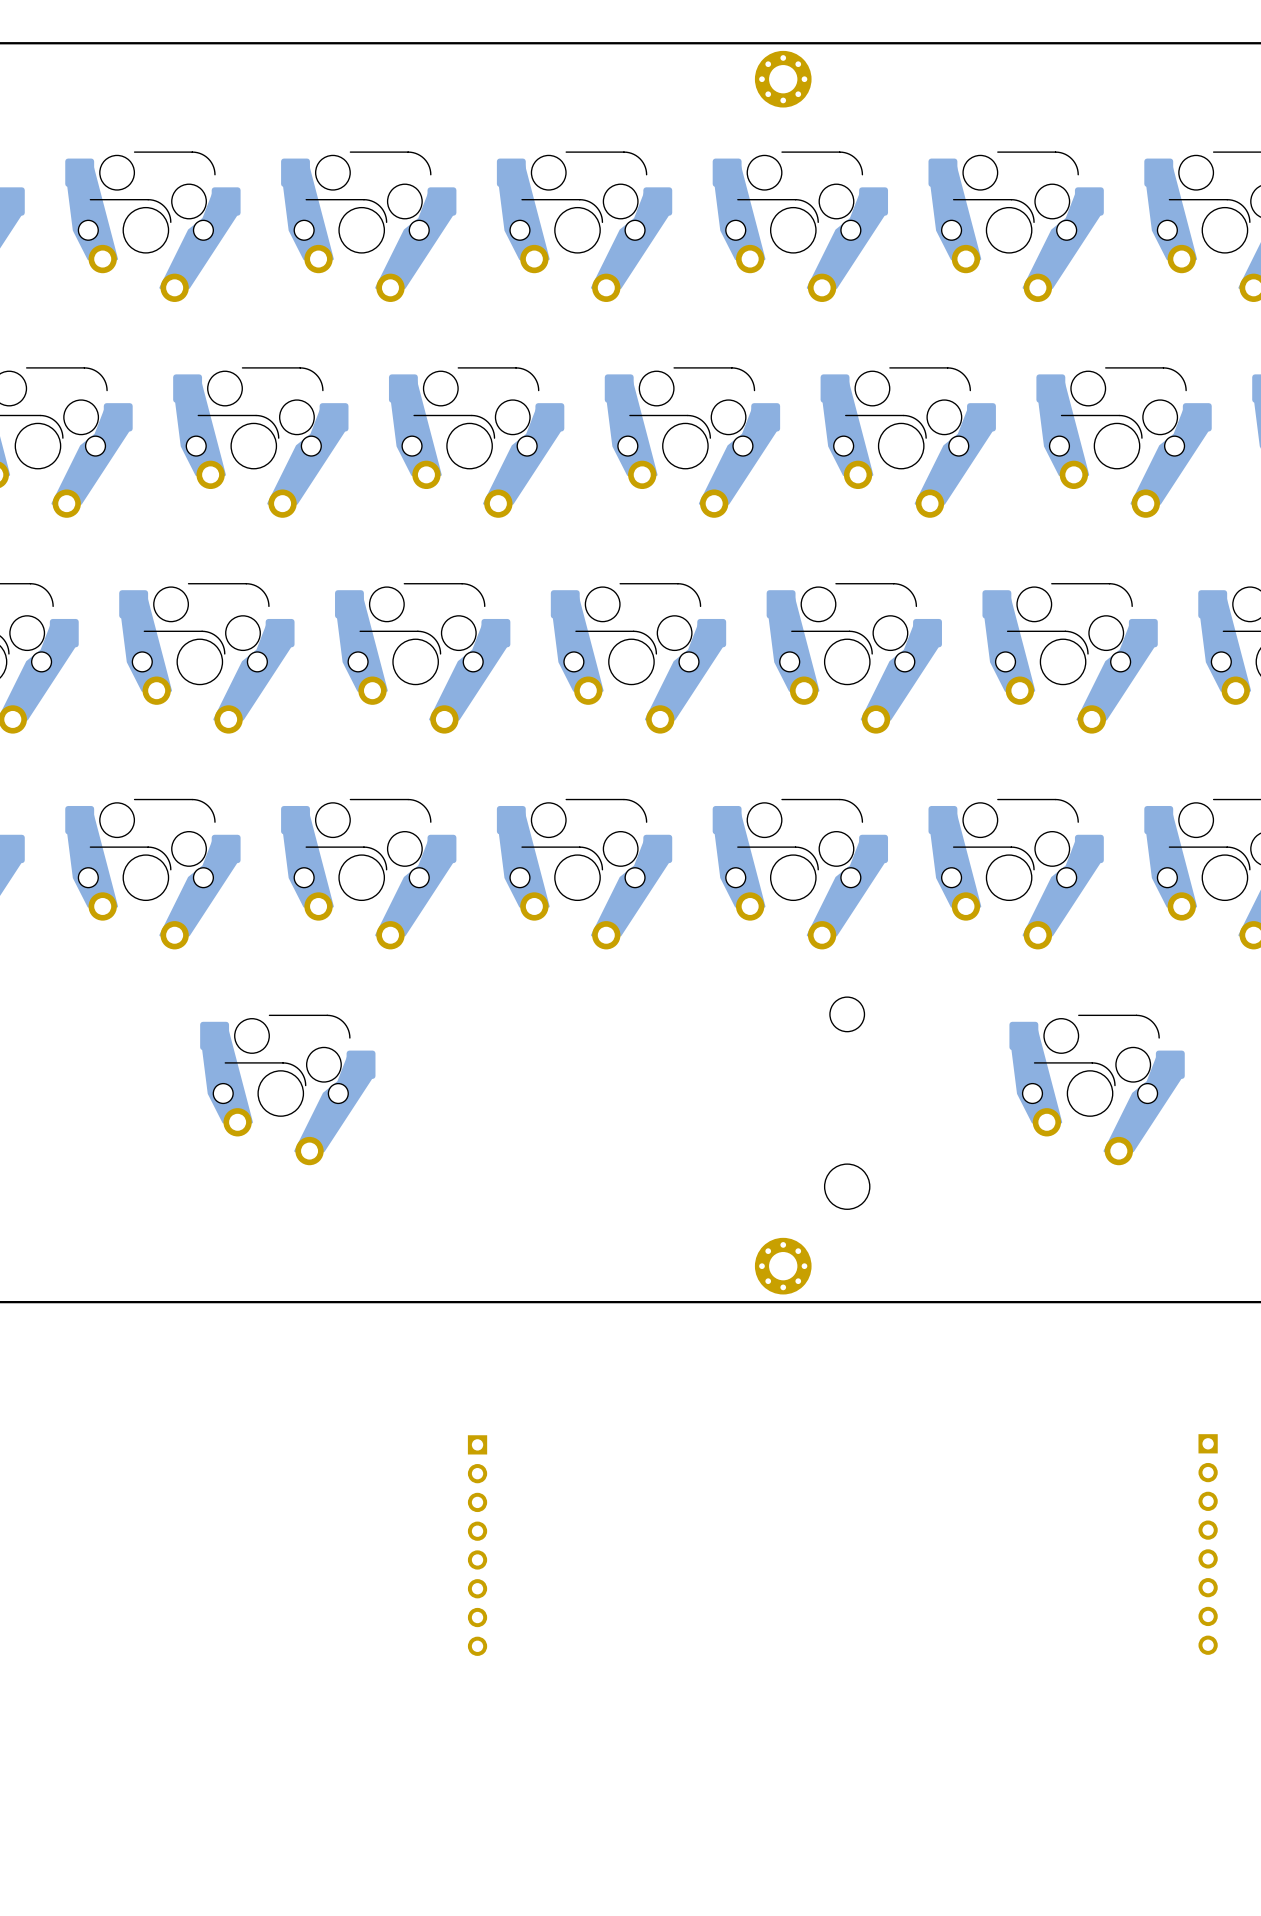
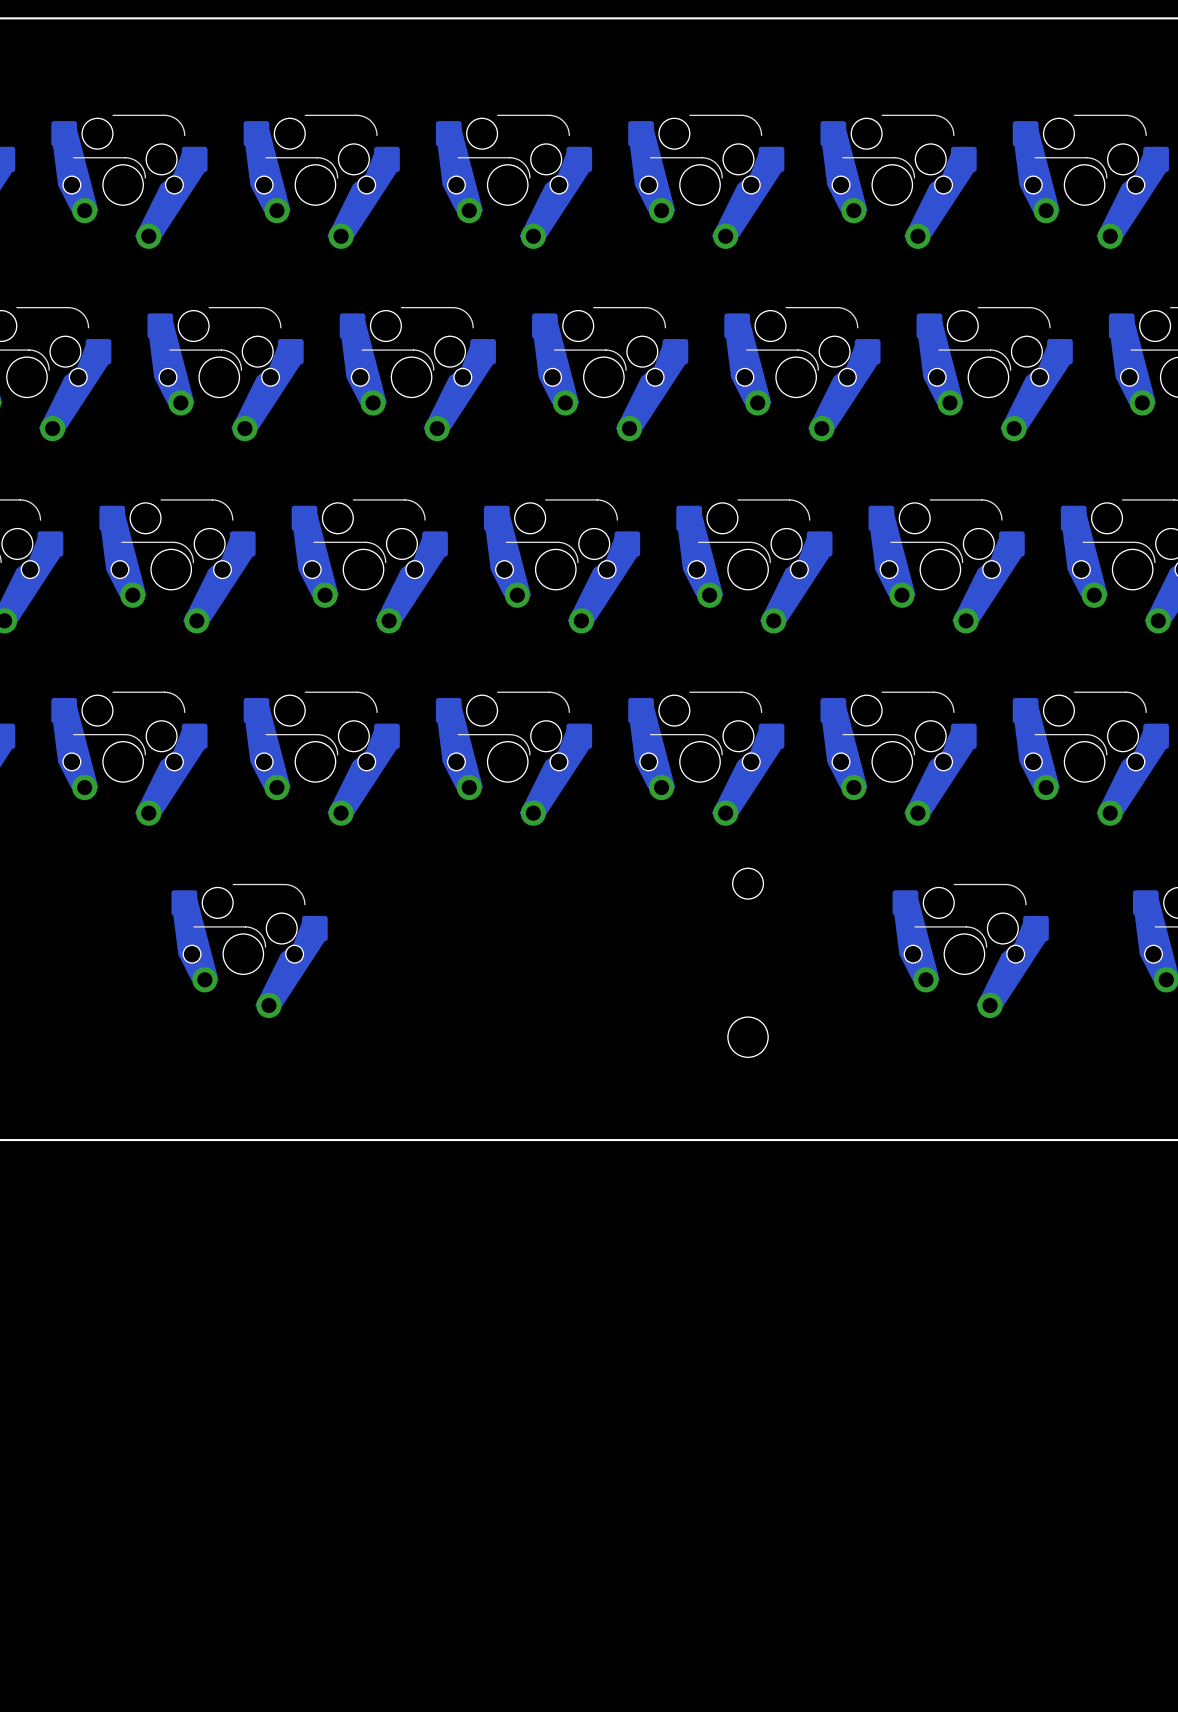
part: (783, 79) -> none
part: (783, 1266) -> none
part: (1208, 1544) -> none
part: (477, 1545) -> none

